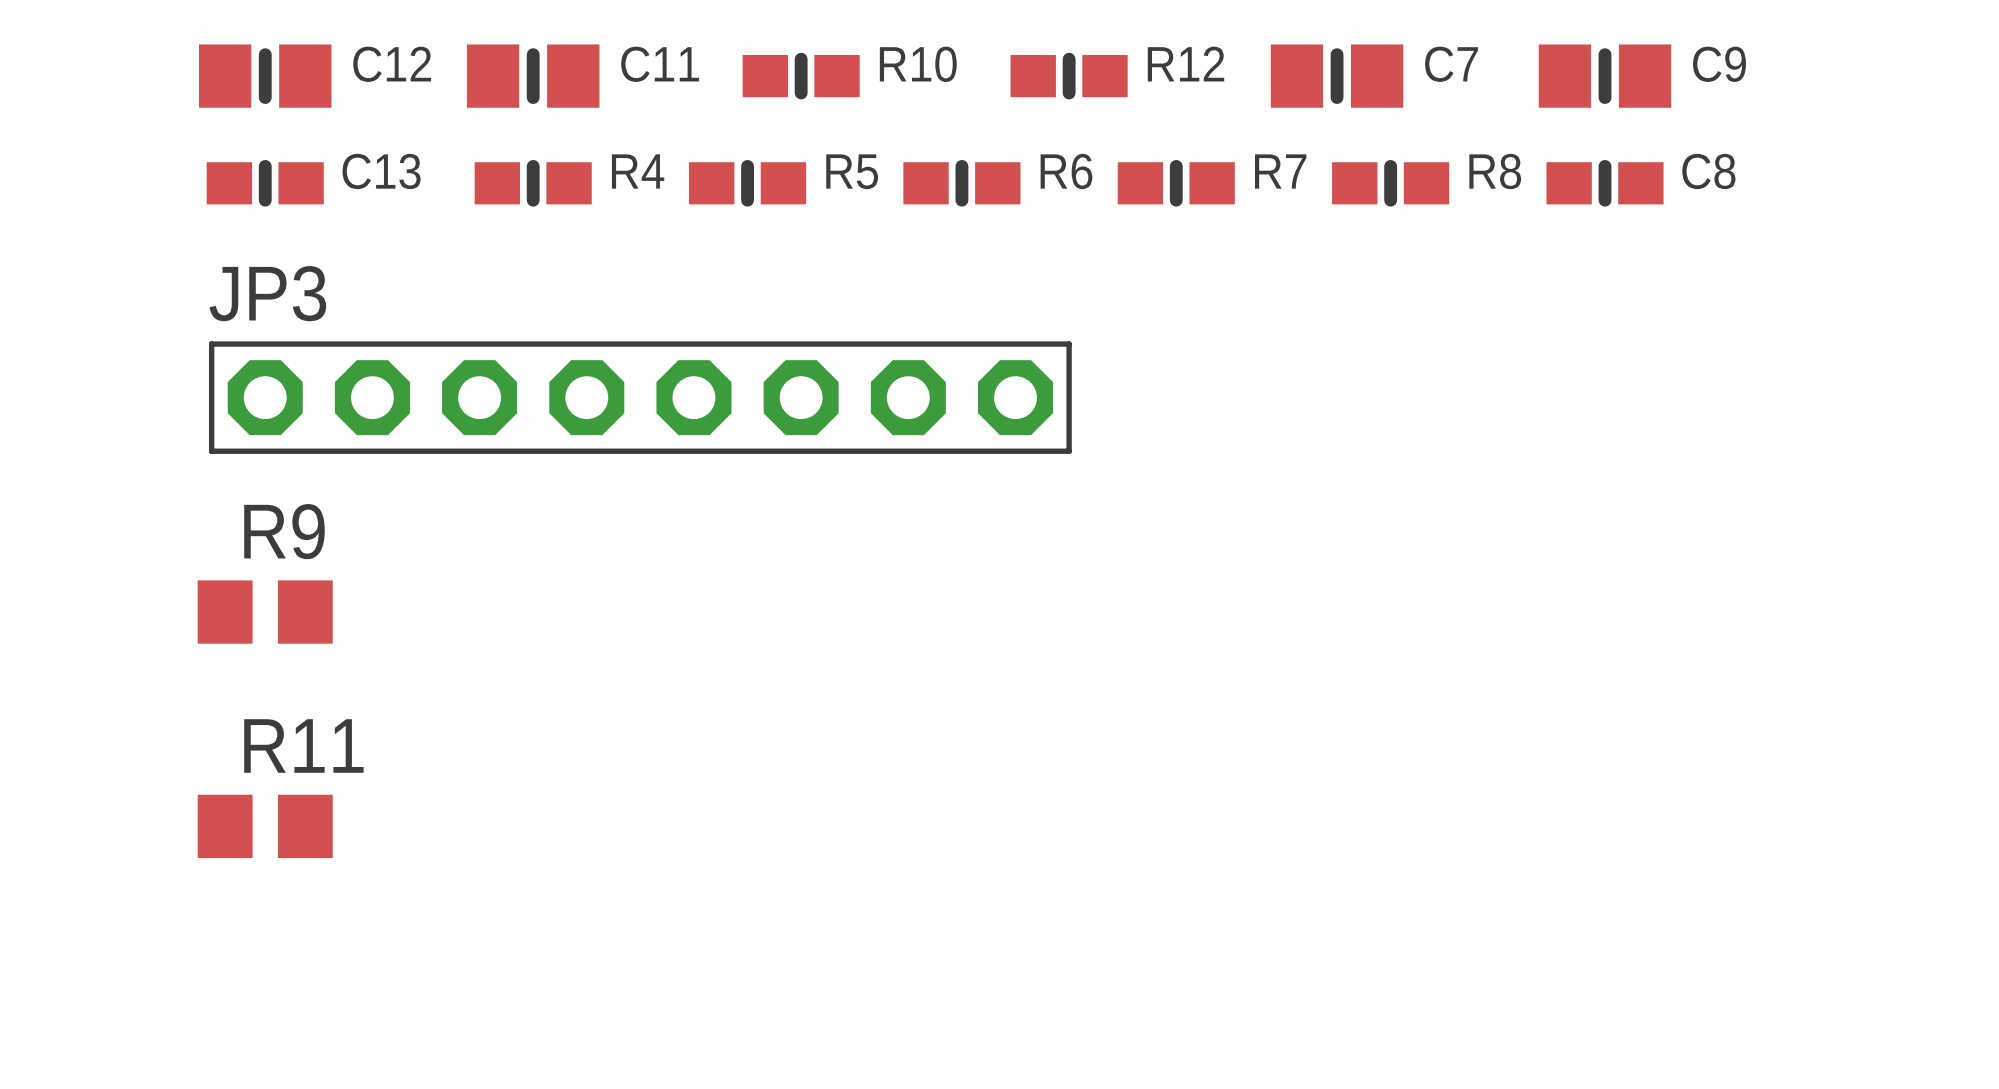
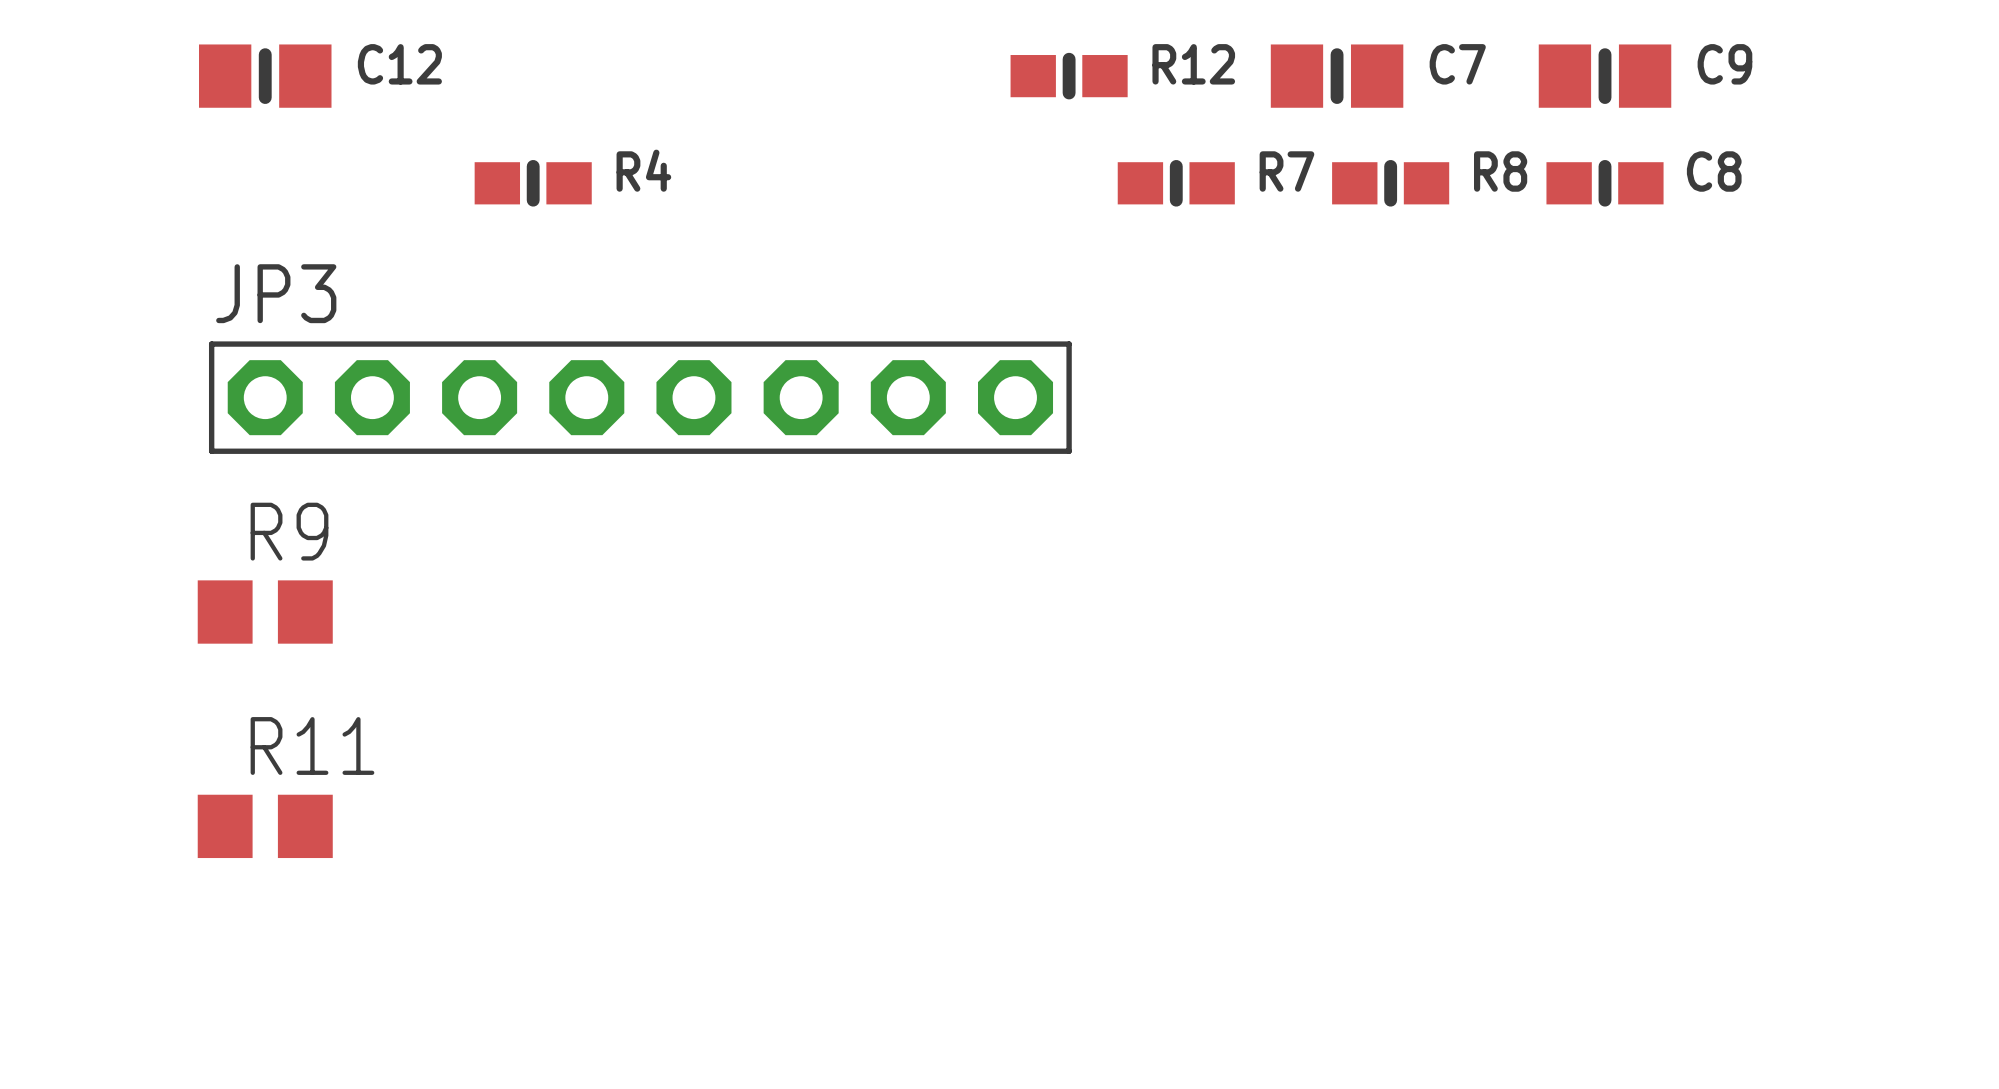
C11: (533, 76) -> none
R10: (801, 76) -> none
C13: (265, 183) -> none
R5: (747, 183) -> none
R6: (961, 183) -> none

